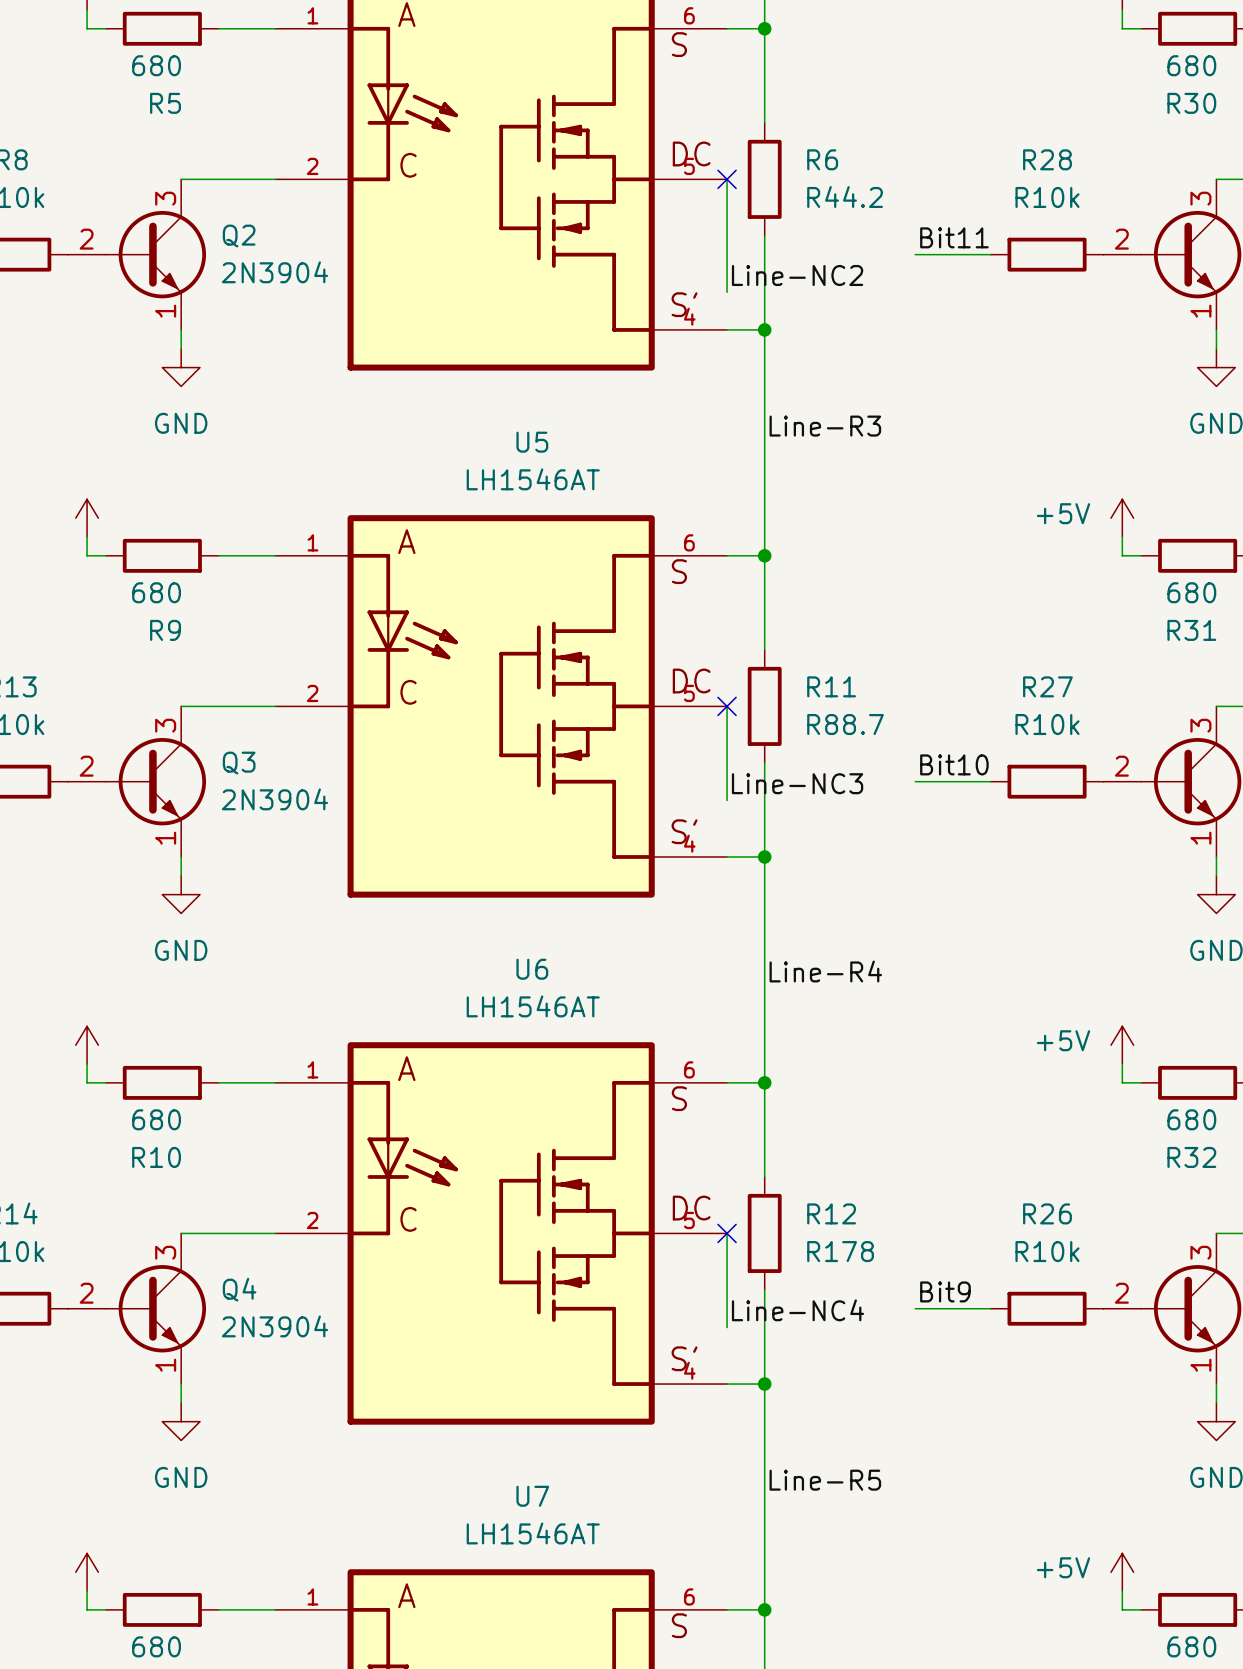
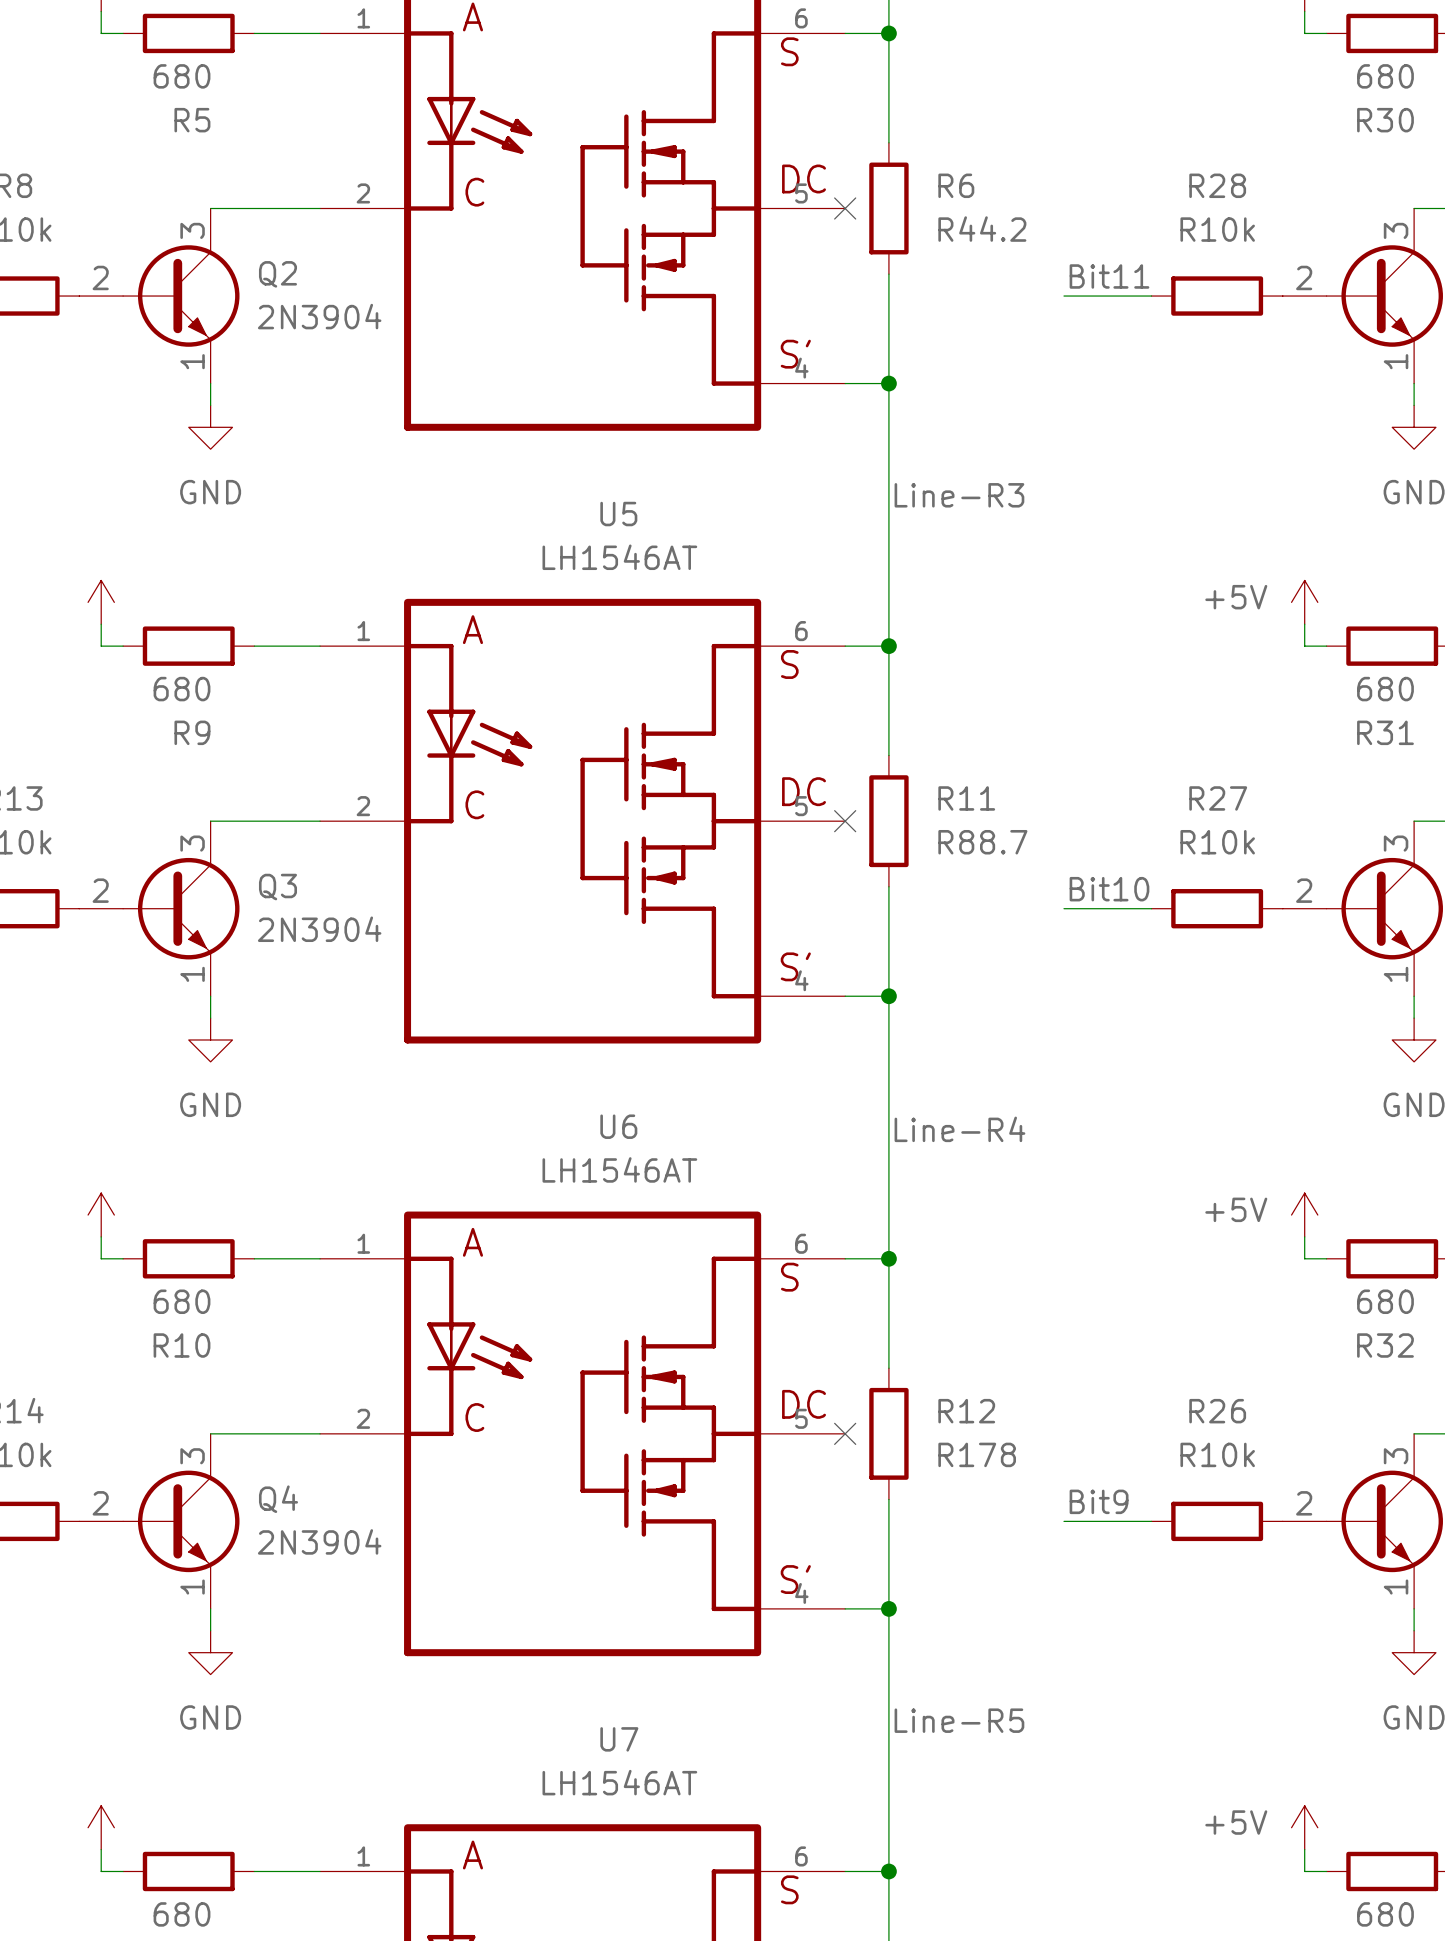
wire: (727, 179) (727, 292) -> none
label: Line-NC2 (797, 275) -> none
wire: (727, 706) (727, 800) -> none
label: Line-NC3 (797, 783) -> none
wire: (727, 1233) (727, 1327) -> none
label: Line-NC4 (798, 1310) -> none

